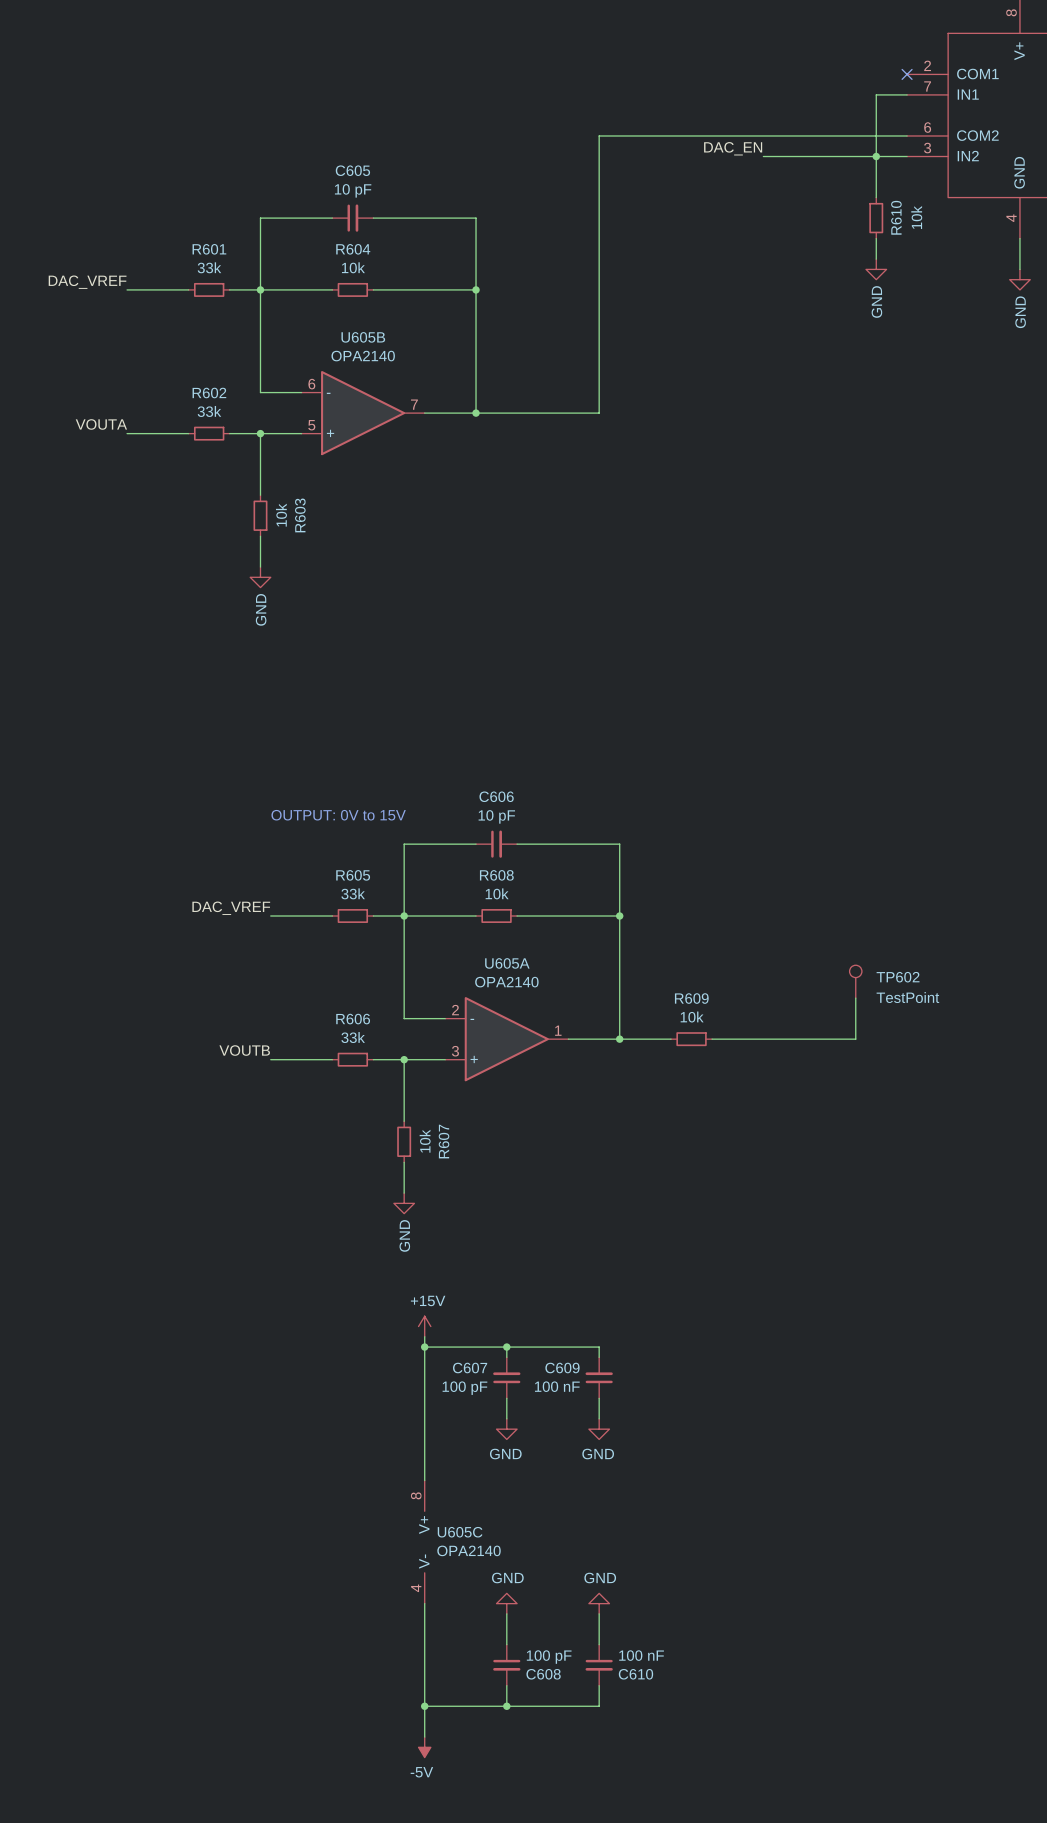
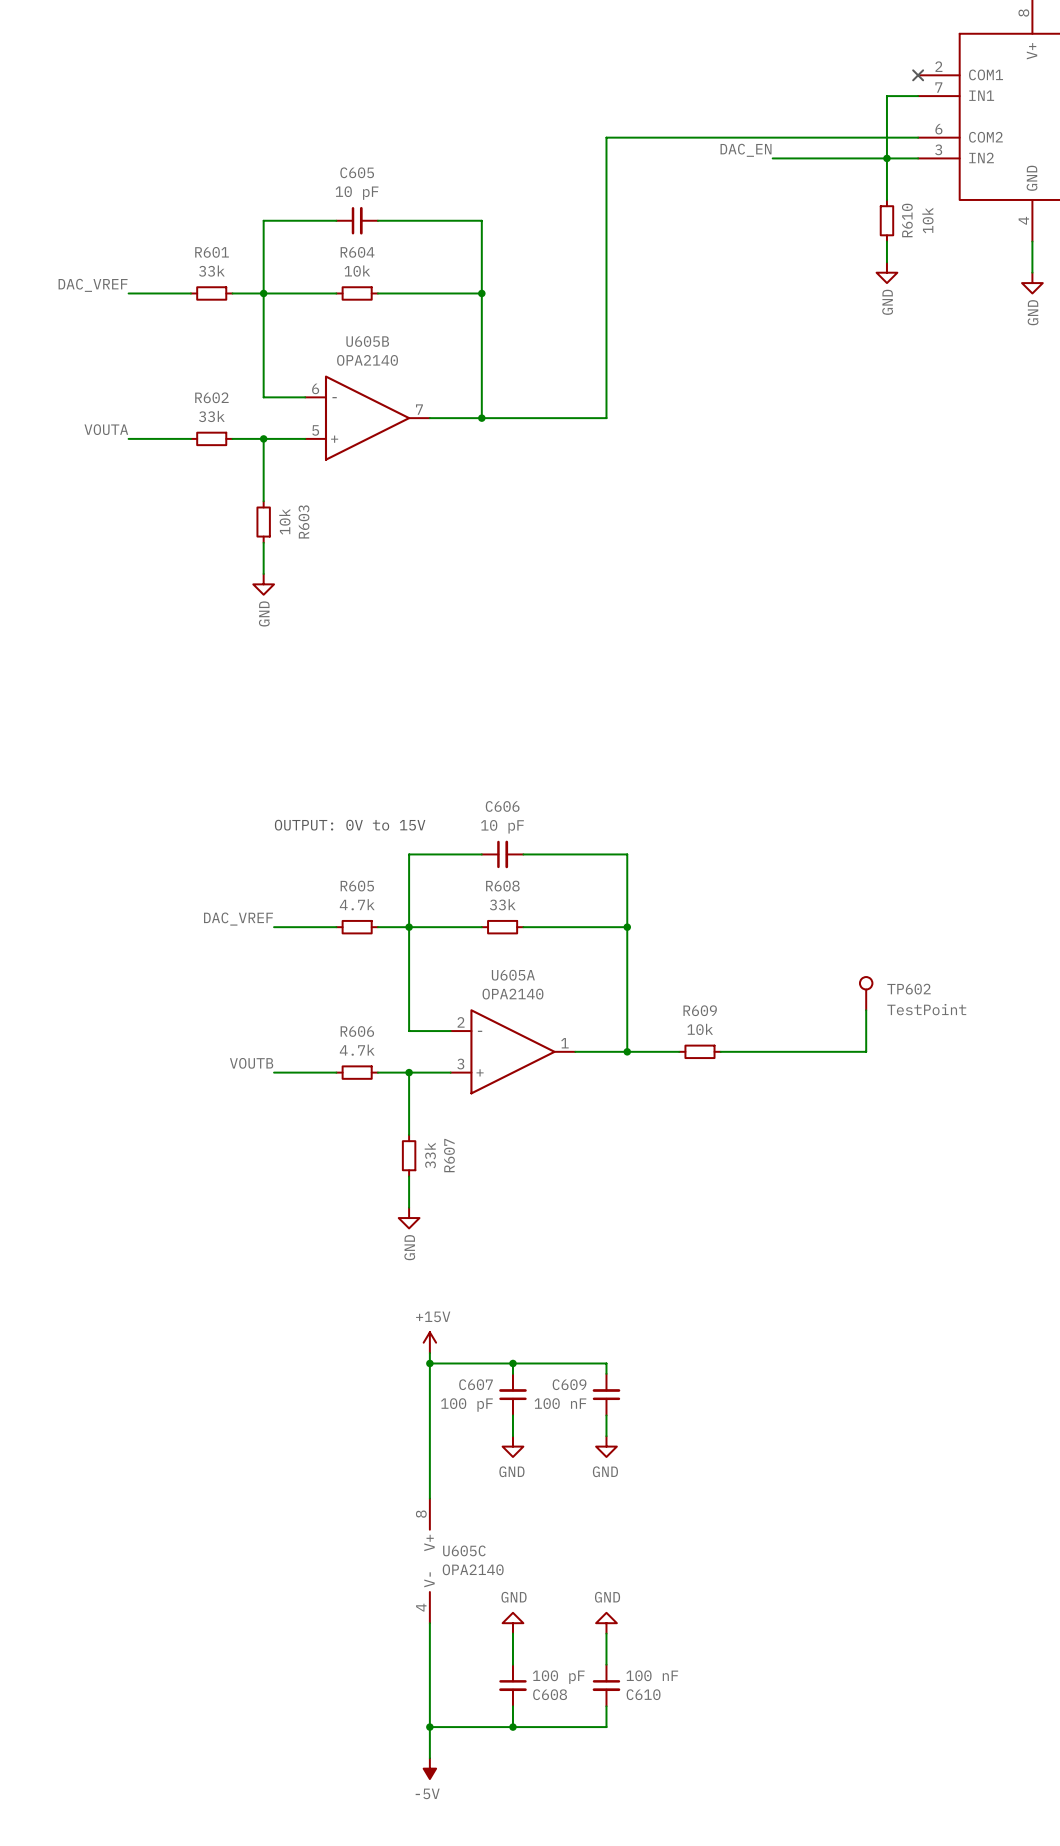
R605 value: 33k (353, 893) -> 4.7k (357, 904)
R608 value: 10k (497, 893) -> 33k (502, 904)
R606 value: 33k (353, 1037) -> 4.7k (357, 1050)
R607 value: 10k (425, 1141) -> 33k (430, 1155)

